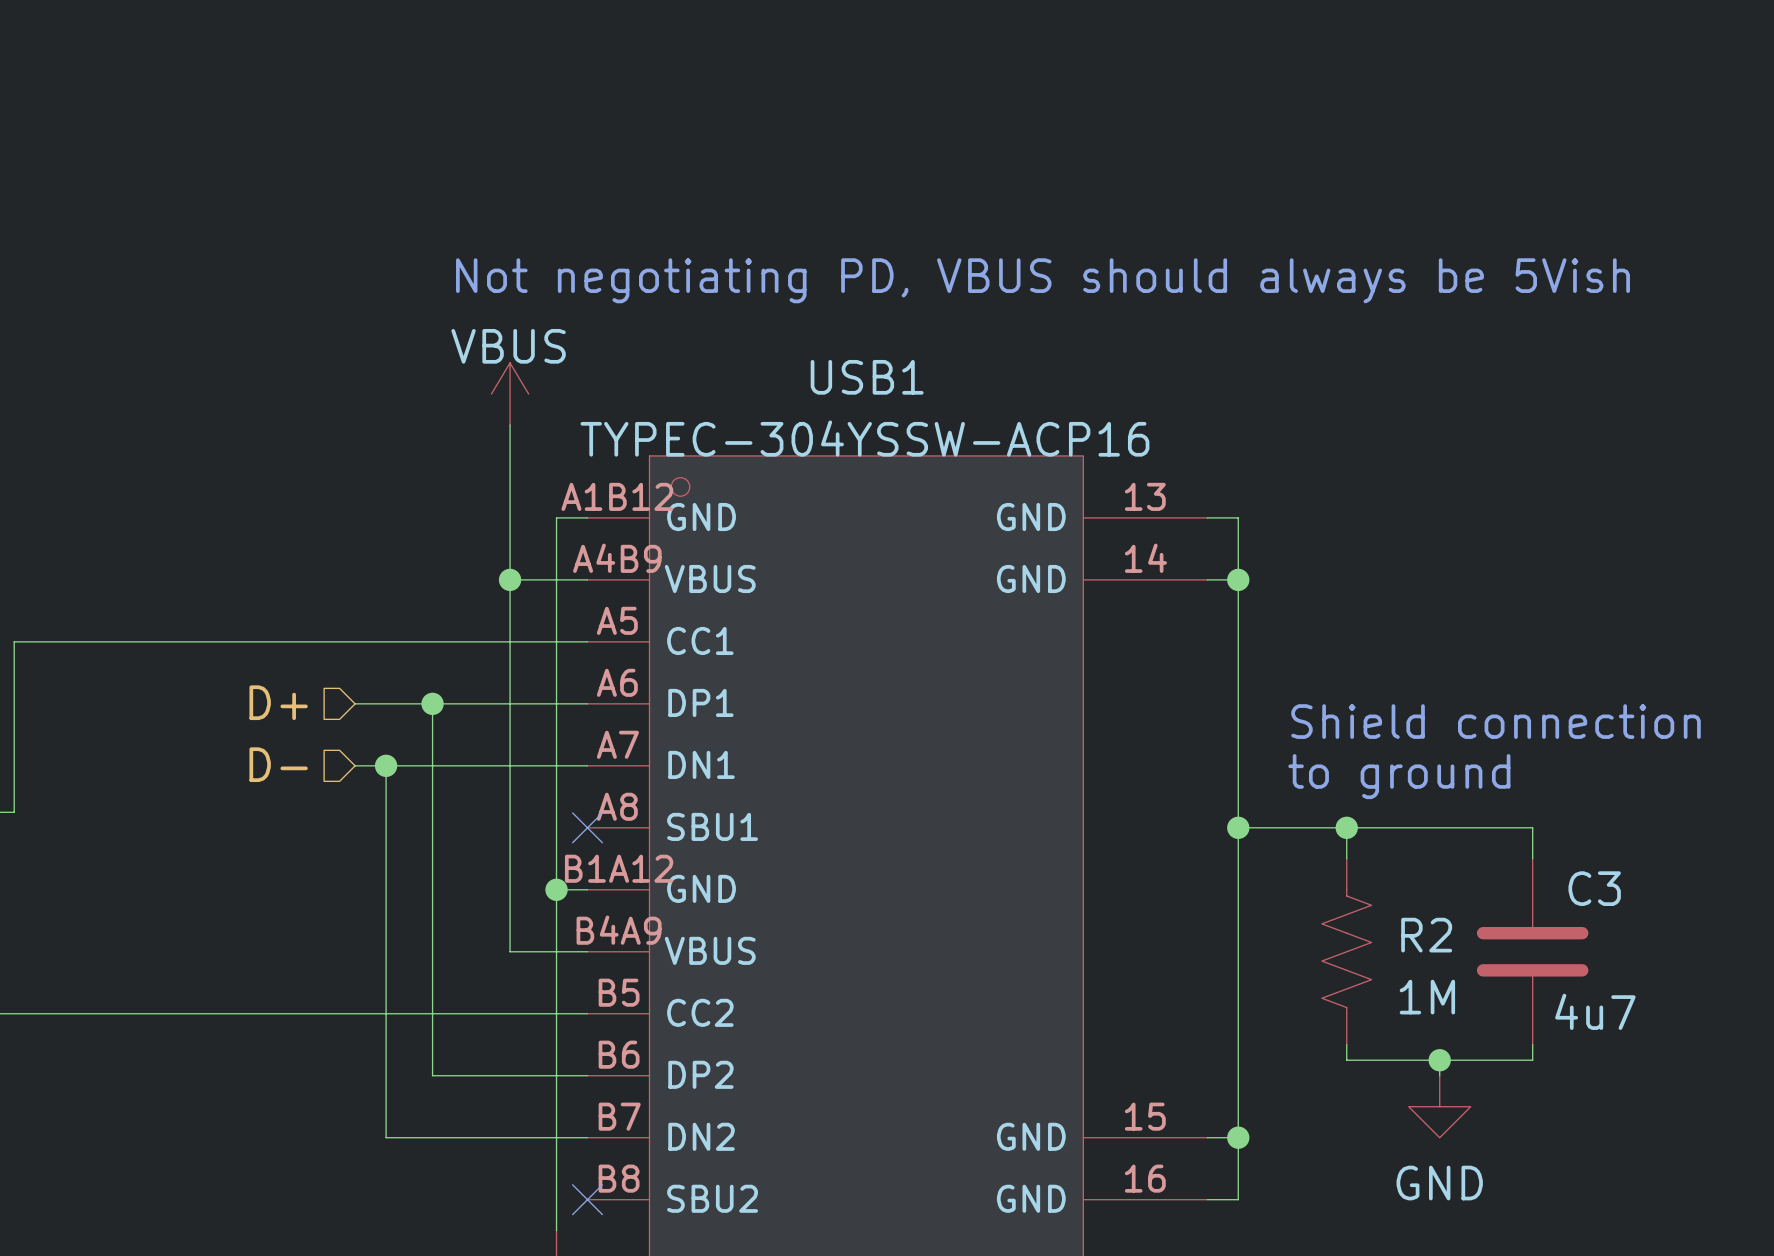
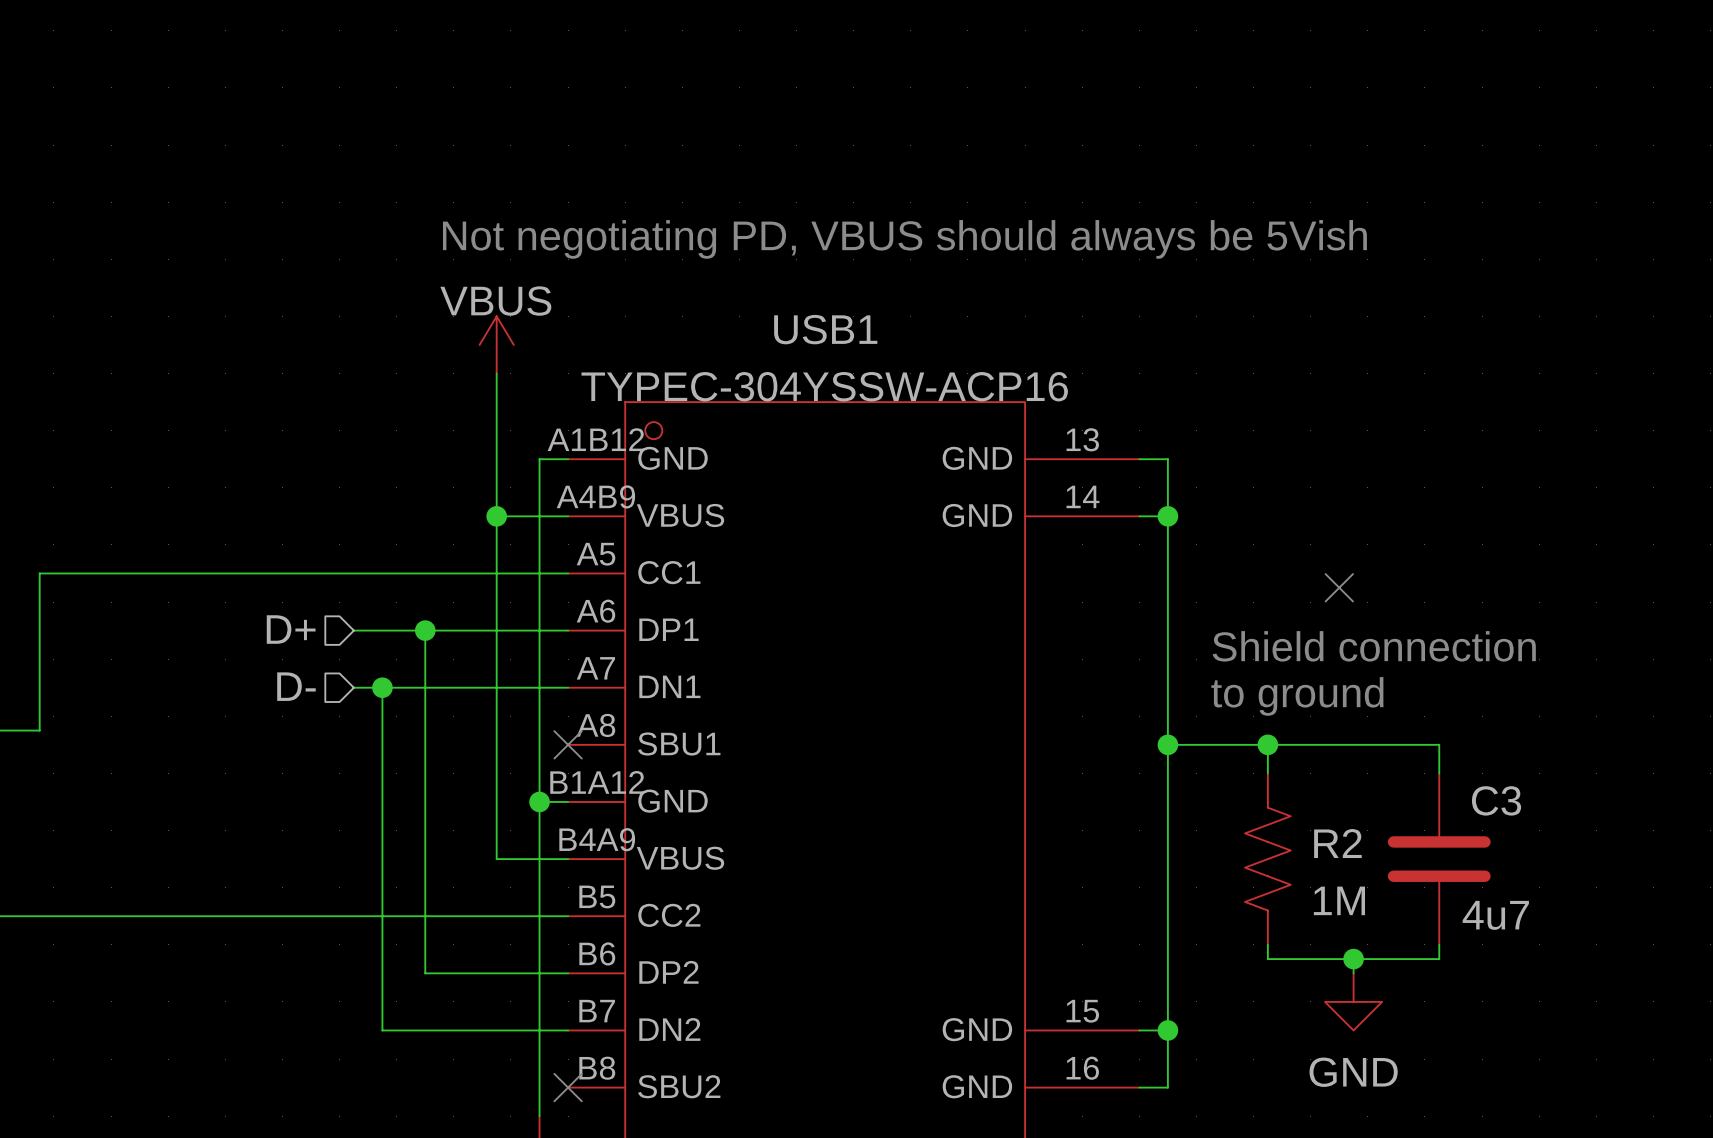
no-connect mark: none -> (1339, 587)

